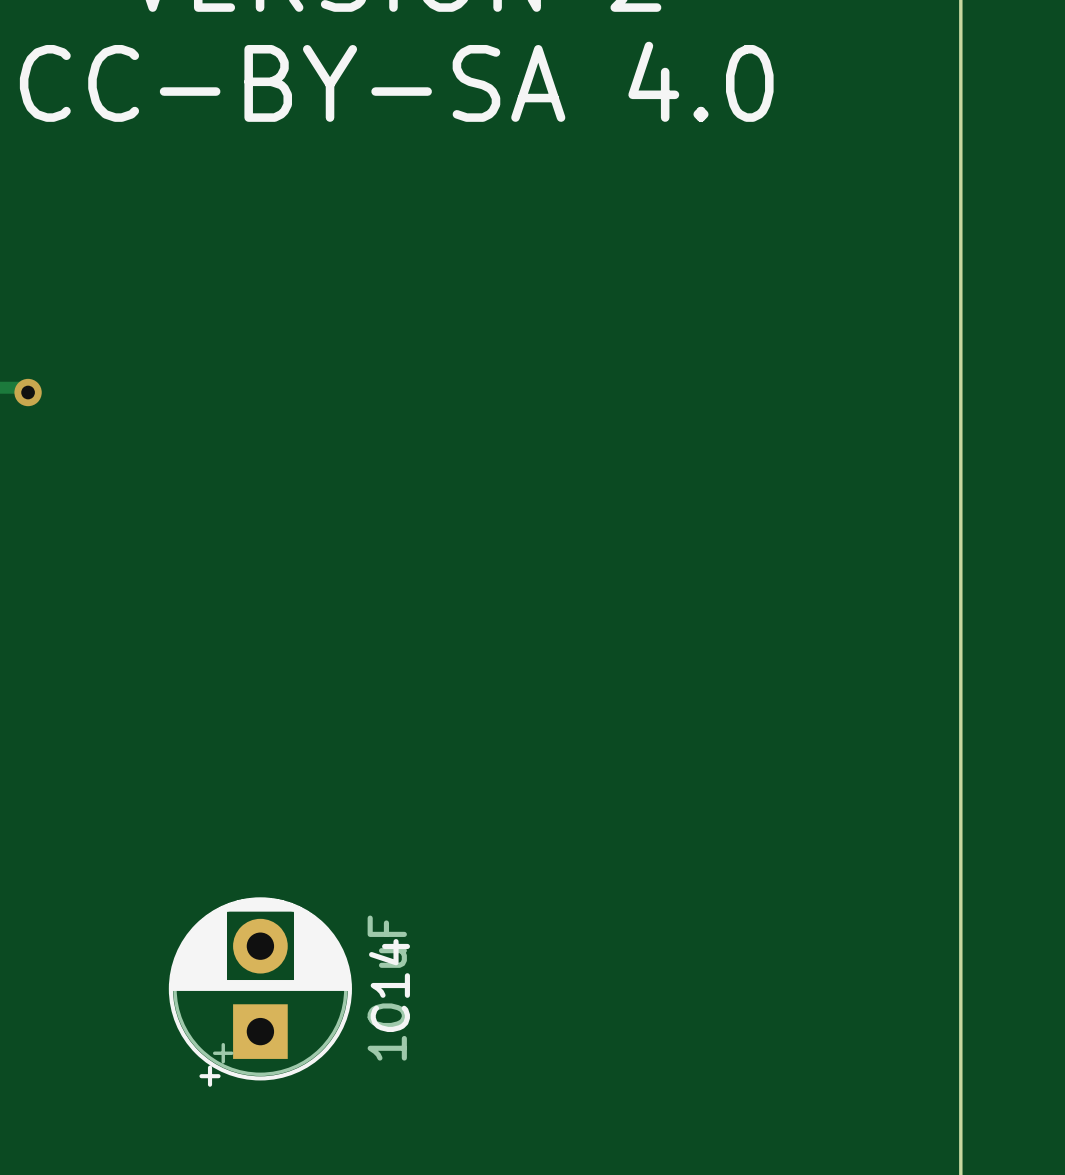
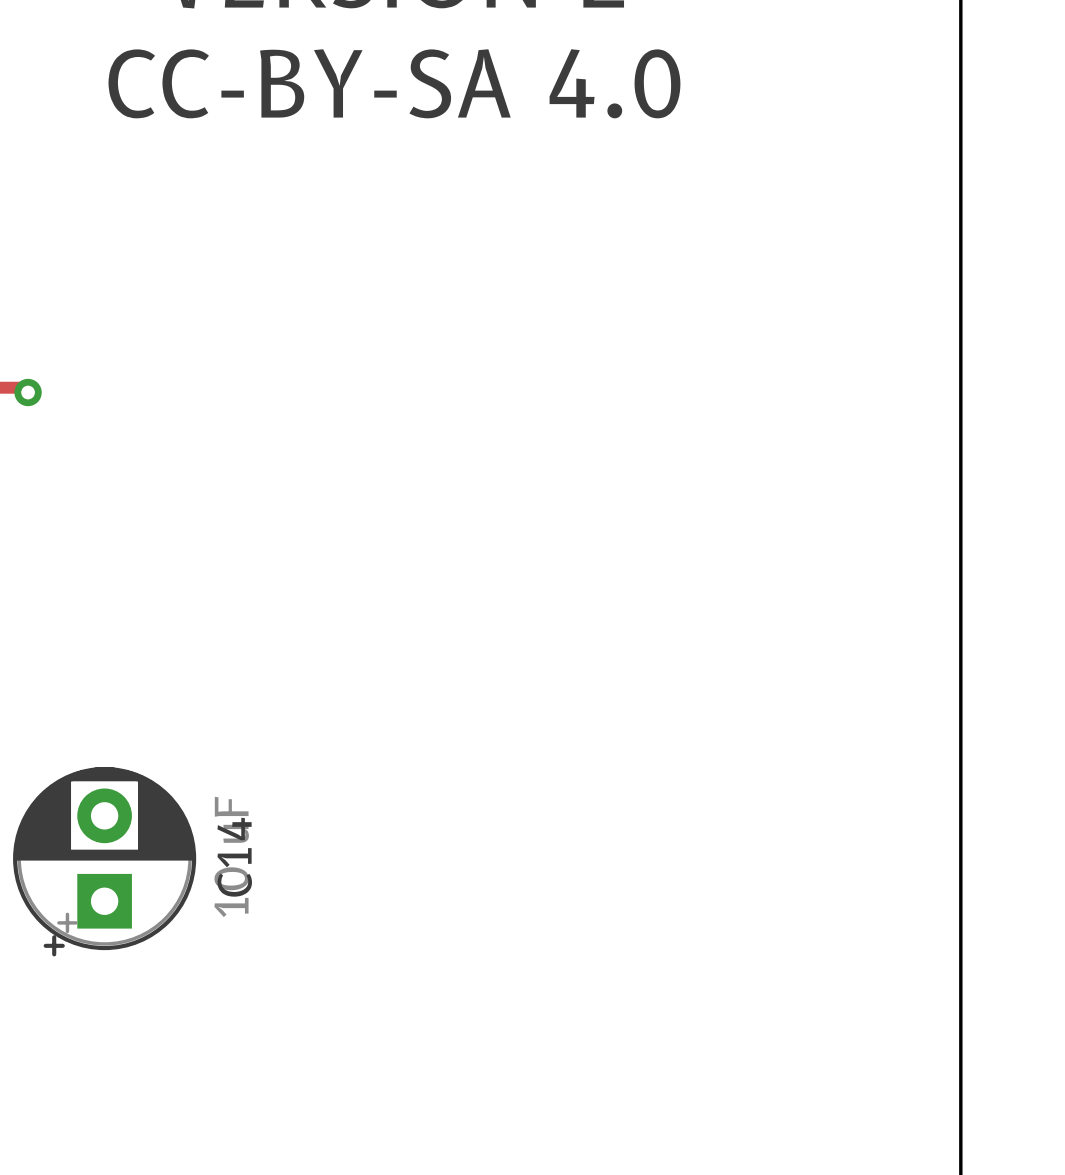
C14 position: (260, 992) -> (104, 861)

